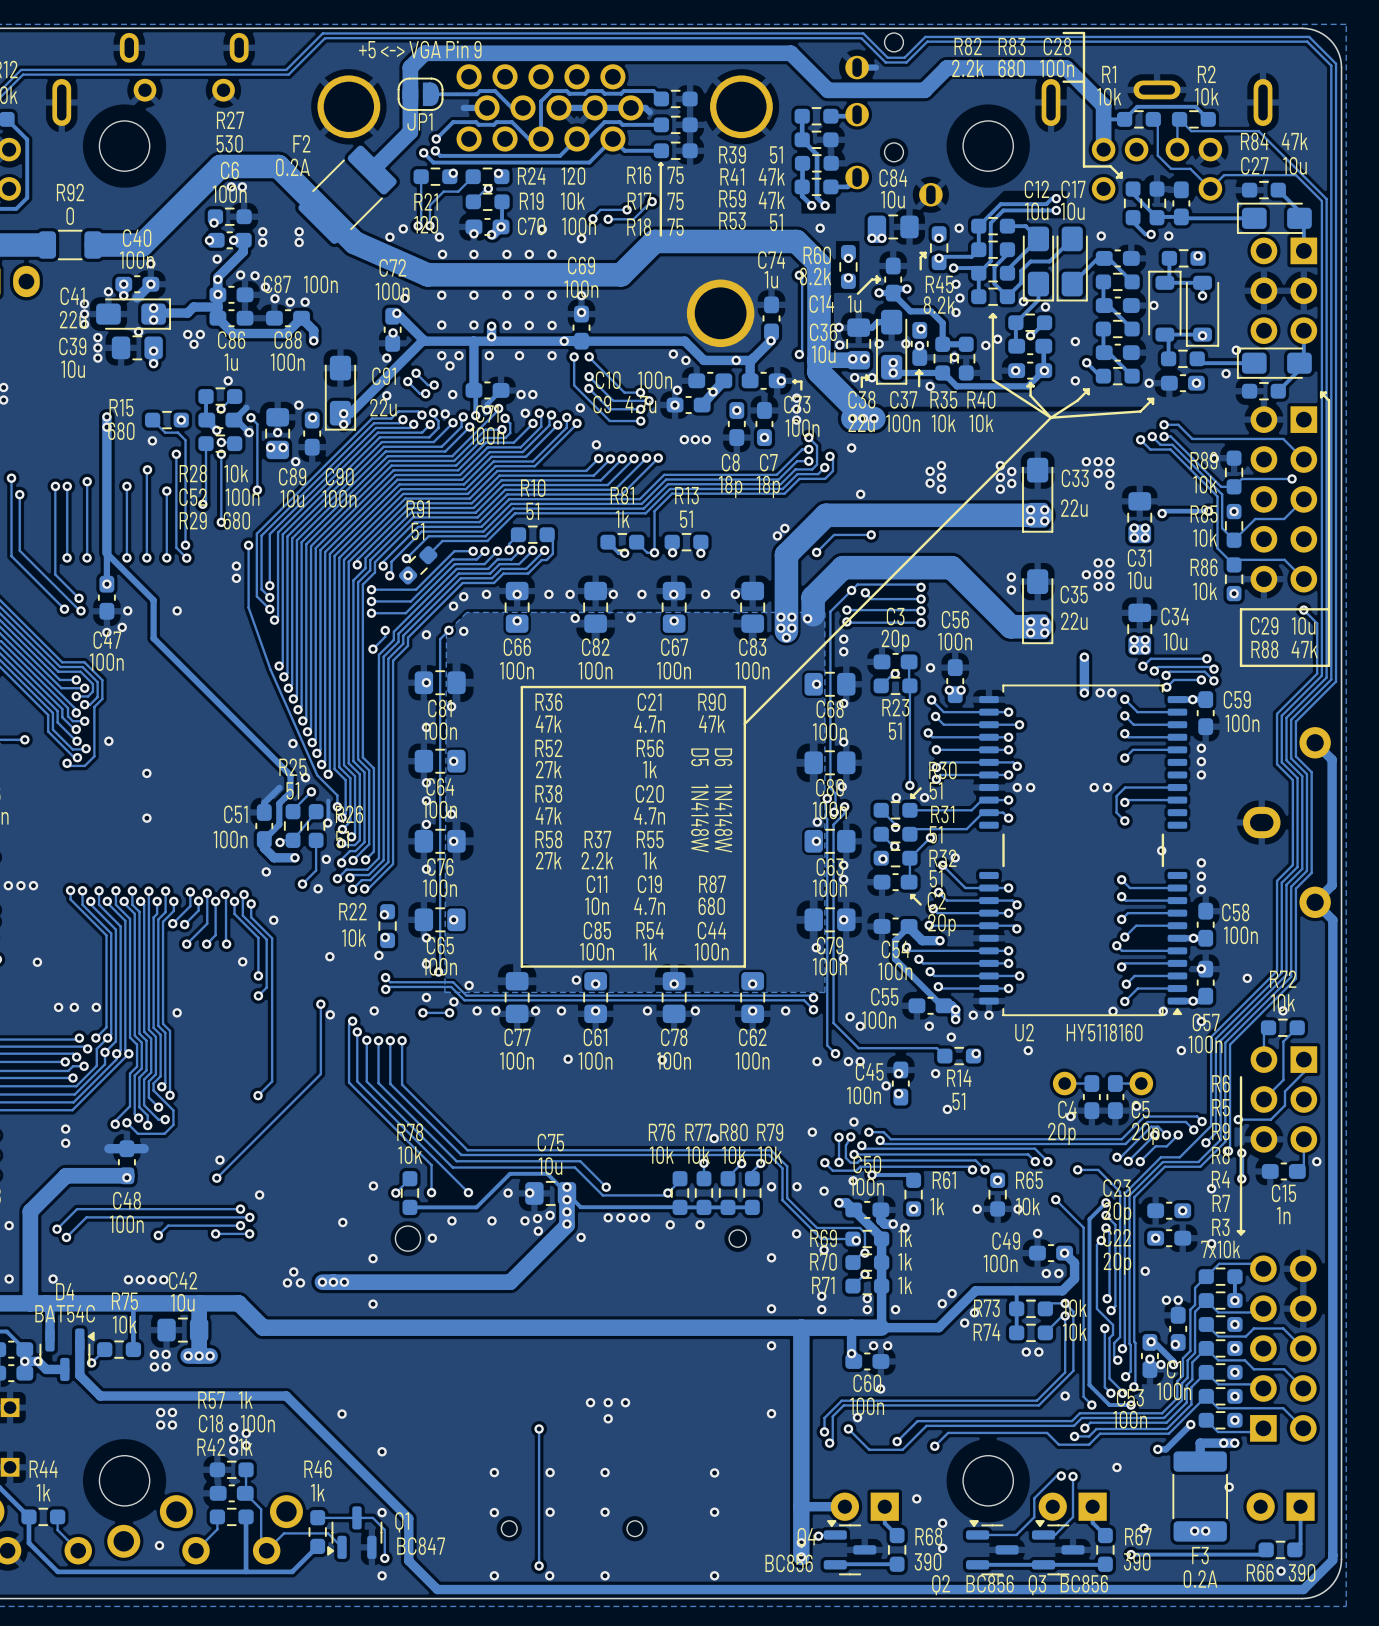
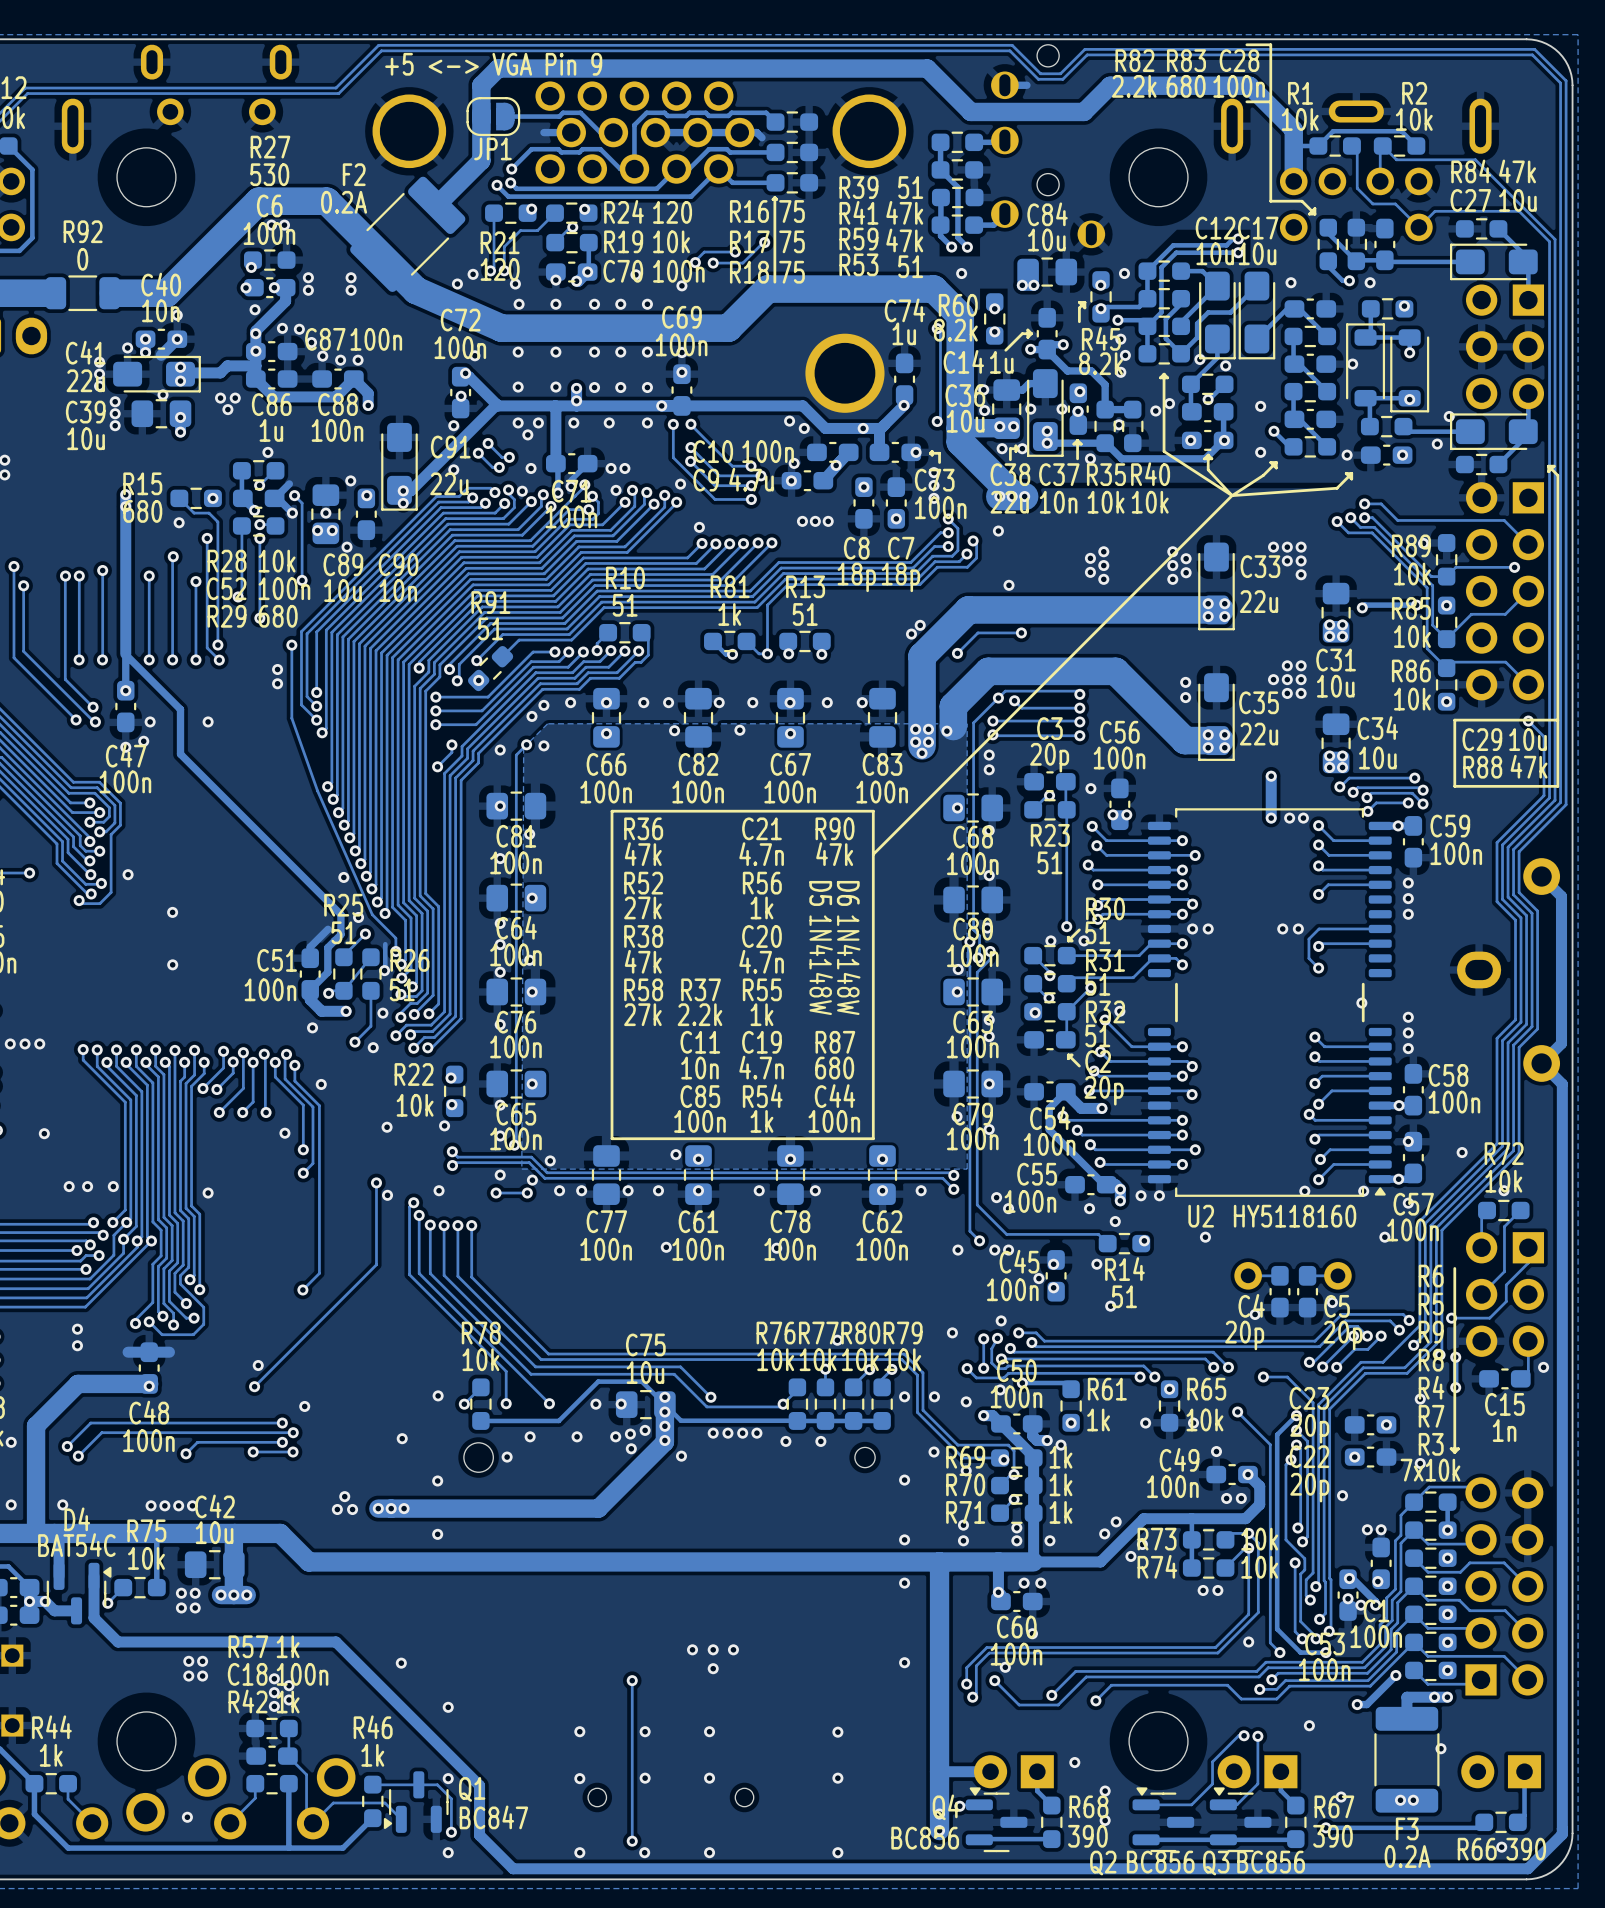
C40 text: 100n (136, 260) -> 10n (160, 310)
C37 text: 100n (903, 423) -> 10n (1058, 502)
C90 text: 100n (339, 498) -> 10n (398, 590)

